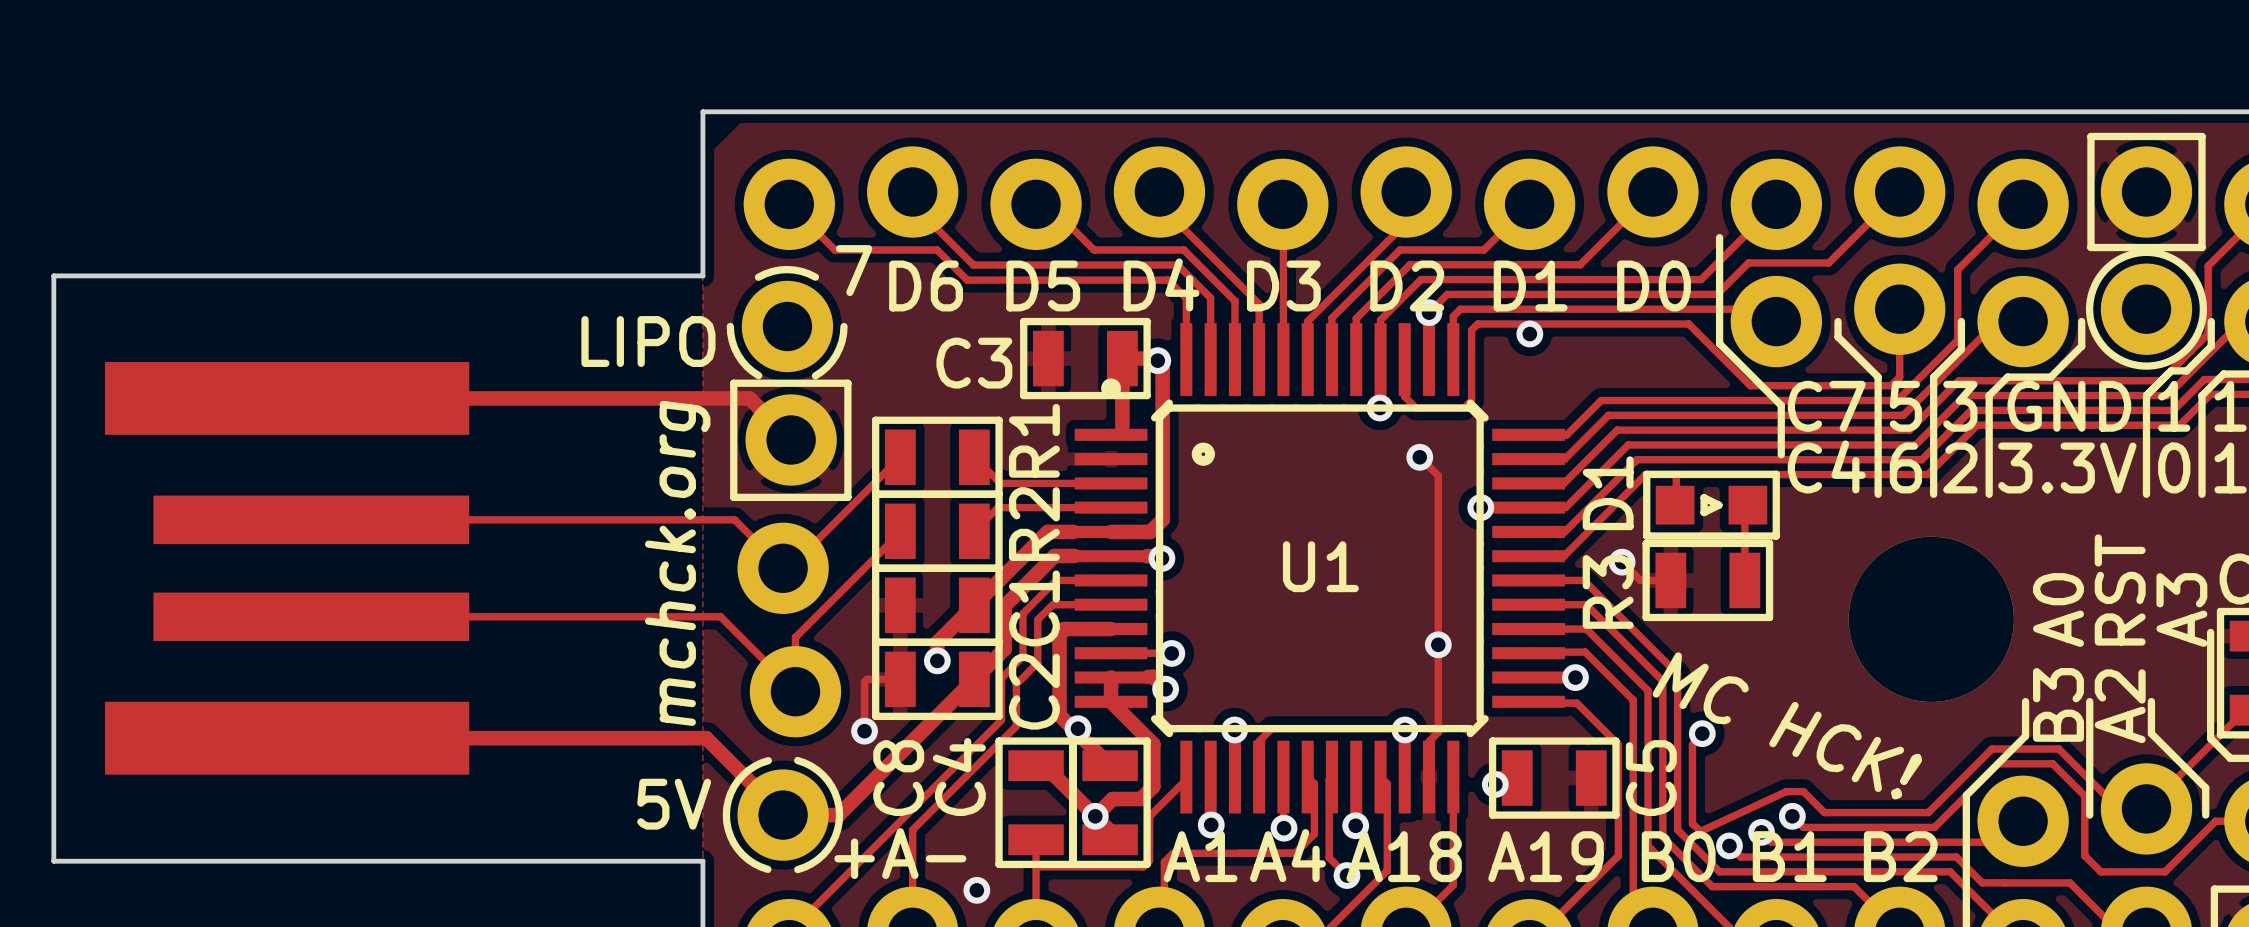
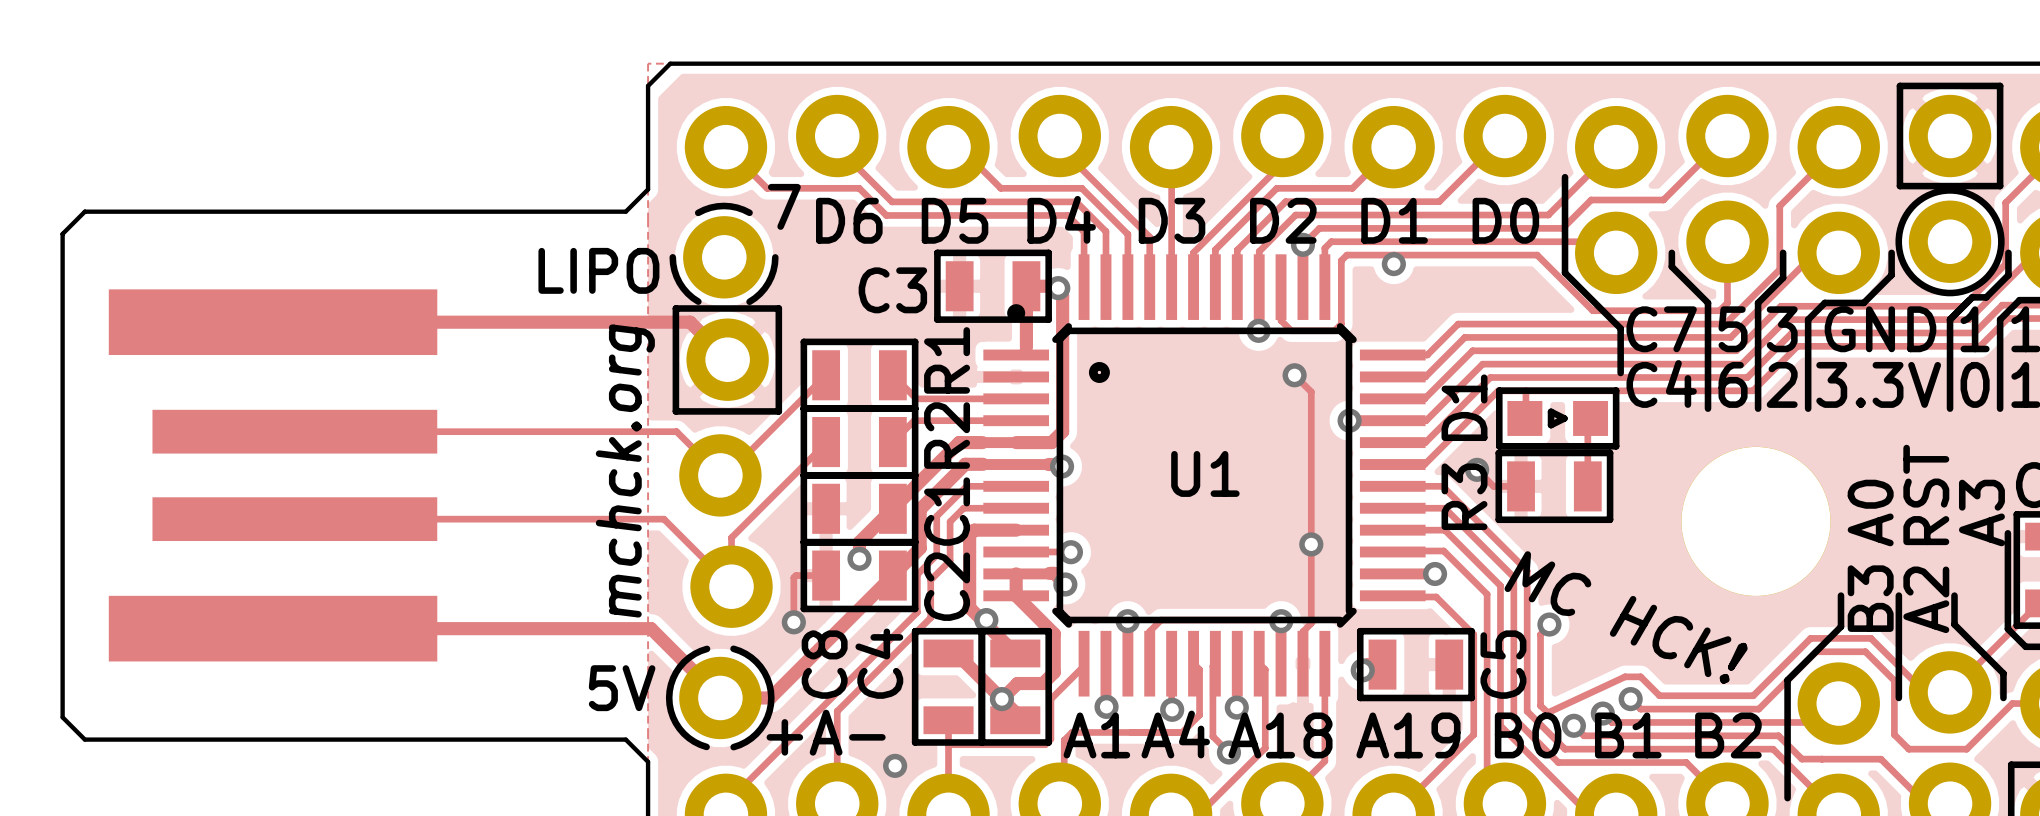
board edge: (727, 111) (702, 111) (702, 136) -> (670, 63) (648, 85)
board edge: (702, 251) (702, 275) (678, 275) -> (648, 189) (625, 211)
board edge: (78, 275) (53, 275) (53, 300) -> (84, 211) (62, 233)
board edge: (53, 836) (53, 861) (78, 861) -> (62, 717) (84, 739)
board edge: (678, 861) (702, 861) (702, 885) -> (625, 739) (648, 761)

